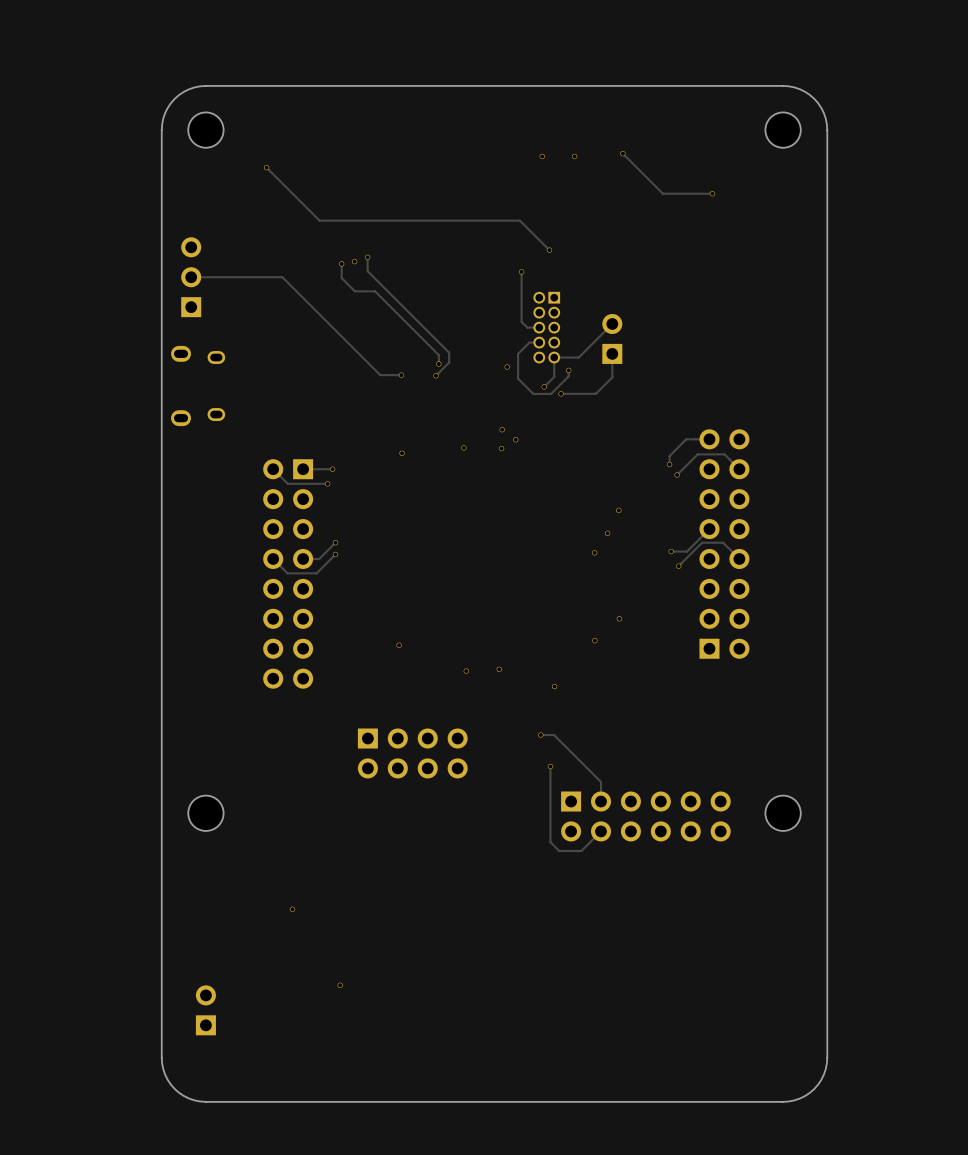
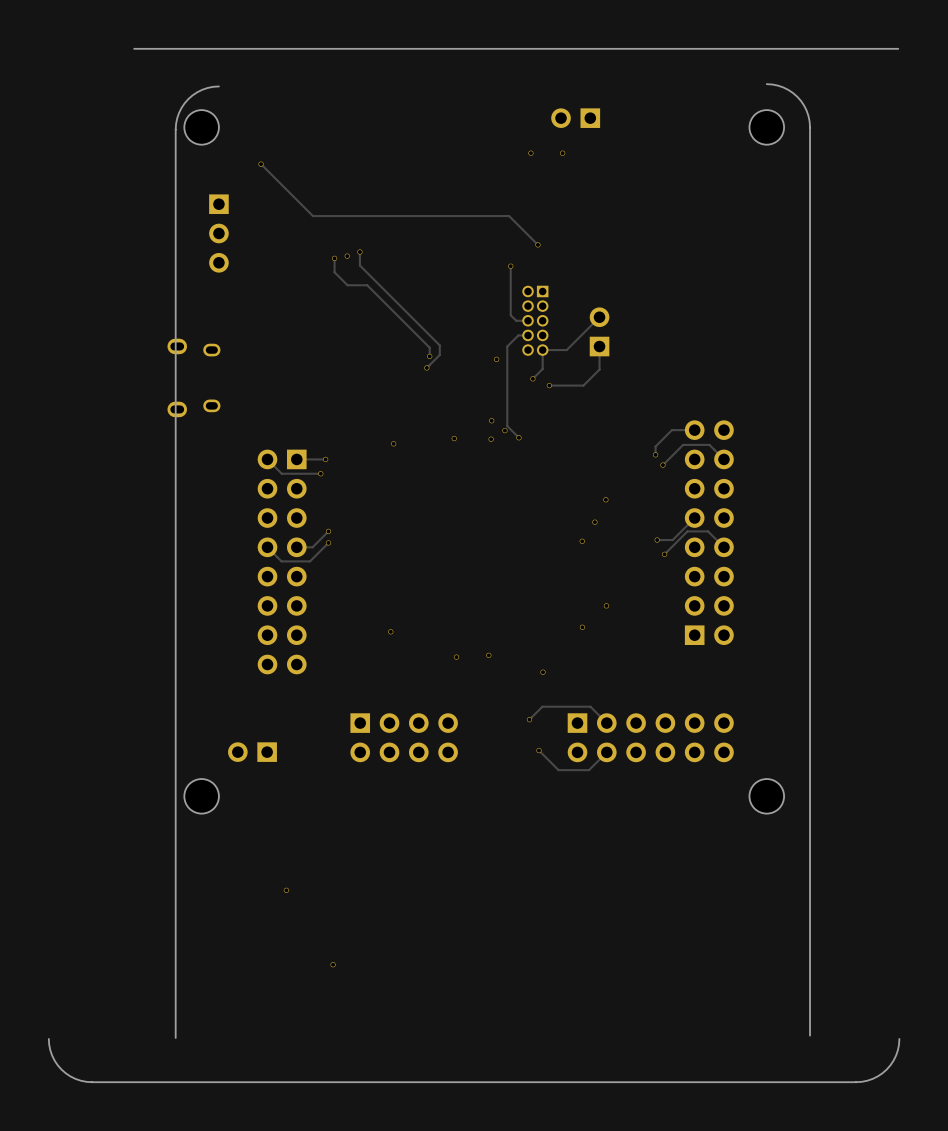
board edge: none -> (898, 48) (134, 48)
board edge: (783, 85) (205, 85) (194, 87) (183, 91) (174, 98) (167, 108) (163, 118) (161, 130) (161, 1057) (165, 1074) (174, 1088) (189, 1098) (205, 1101) (788, 1101) (805, 1095) (818, 1084) (823, 1074) (827, 1057) -> none
board edge: none -> (218, 86) (202, 89) (188, 99) (178, 113) (175, 129) (175, 1037)
part: none -> (575, 118)
track: (622, 153) (662, 193) (712, 193) -> none
via: (622, 153) -> none
via: (712, 193) -> none
track: (191, 277) (282, 277) (380, 375) (401, 375) -> none
part rotation: 0° (191, 277) -> 180° (218, 233)
part position: (191, 277) -> (218, 233)
track: (568, 370) (568, 376) (551, 393) (533, 393) (518, 378) -> (518, 437) (507, 426) (507, 370)
via: (568, 370) -> none
via: (401, 375) -> none
via: none -> (518, 437)
track: (540, 735) (554, 735) (601, 781) (601, 801) -> (529, 719) (542, 706) (590, 706) (606, 723)
track: (550, 766) (550, 842) (559, 850) (581, 850) (601, 831) -> (538, 750) (558, 770) (589, 770) (606, 752)
part position: (645, 816) -> (650, 737)
part rotation: 0° (205, 1010) -> 90° counterclockwise (252, 752)
part position: (205, 1010) -> (252, 752)
board edge: none -> (899, 1038) (896, 1055) (886, 1069) (872, 1078) (856, 1082) (92, 1082) (75, 1078) (61, 1069) (52, 1055) (48, 1038)

